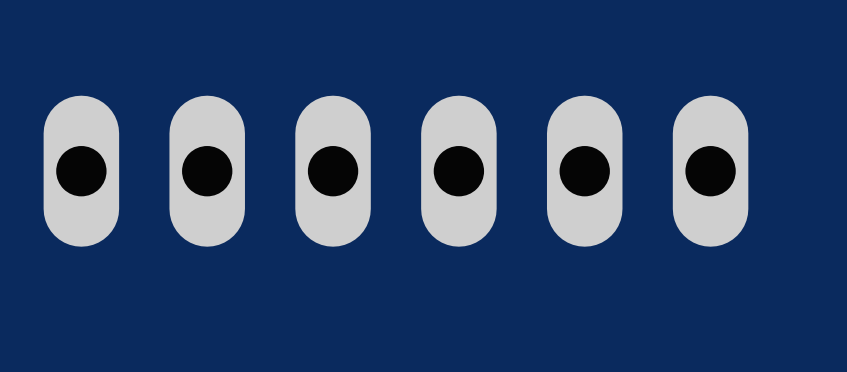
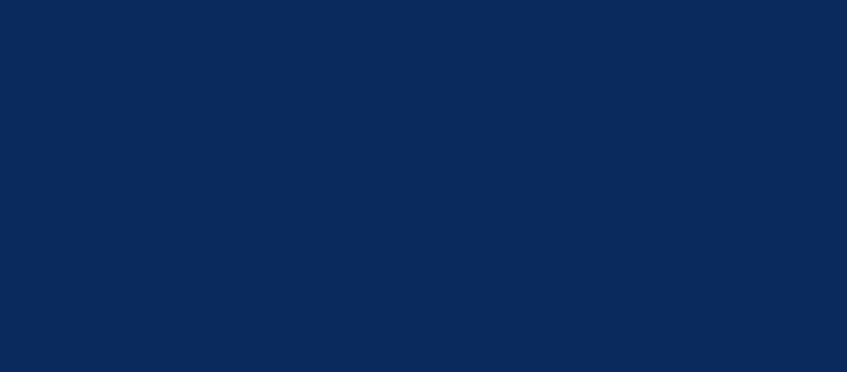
part: (395, 171) -> none

